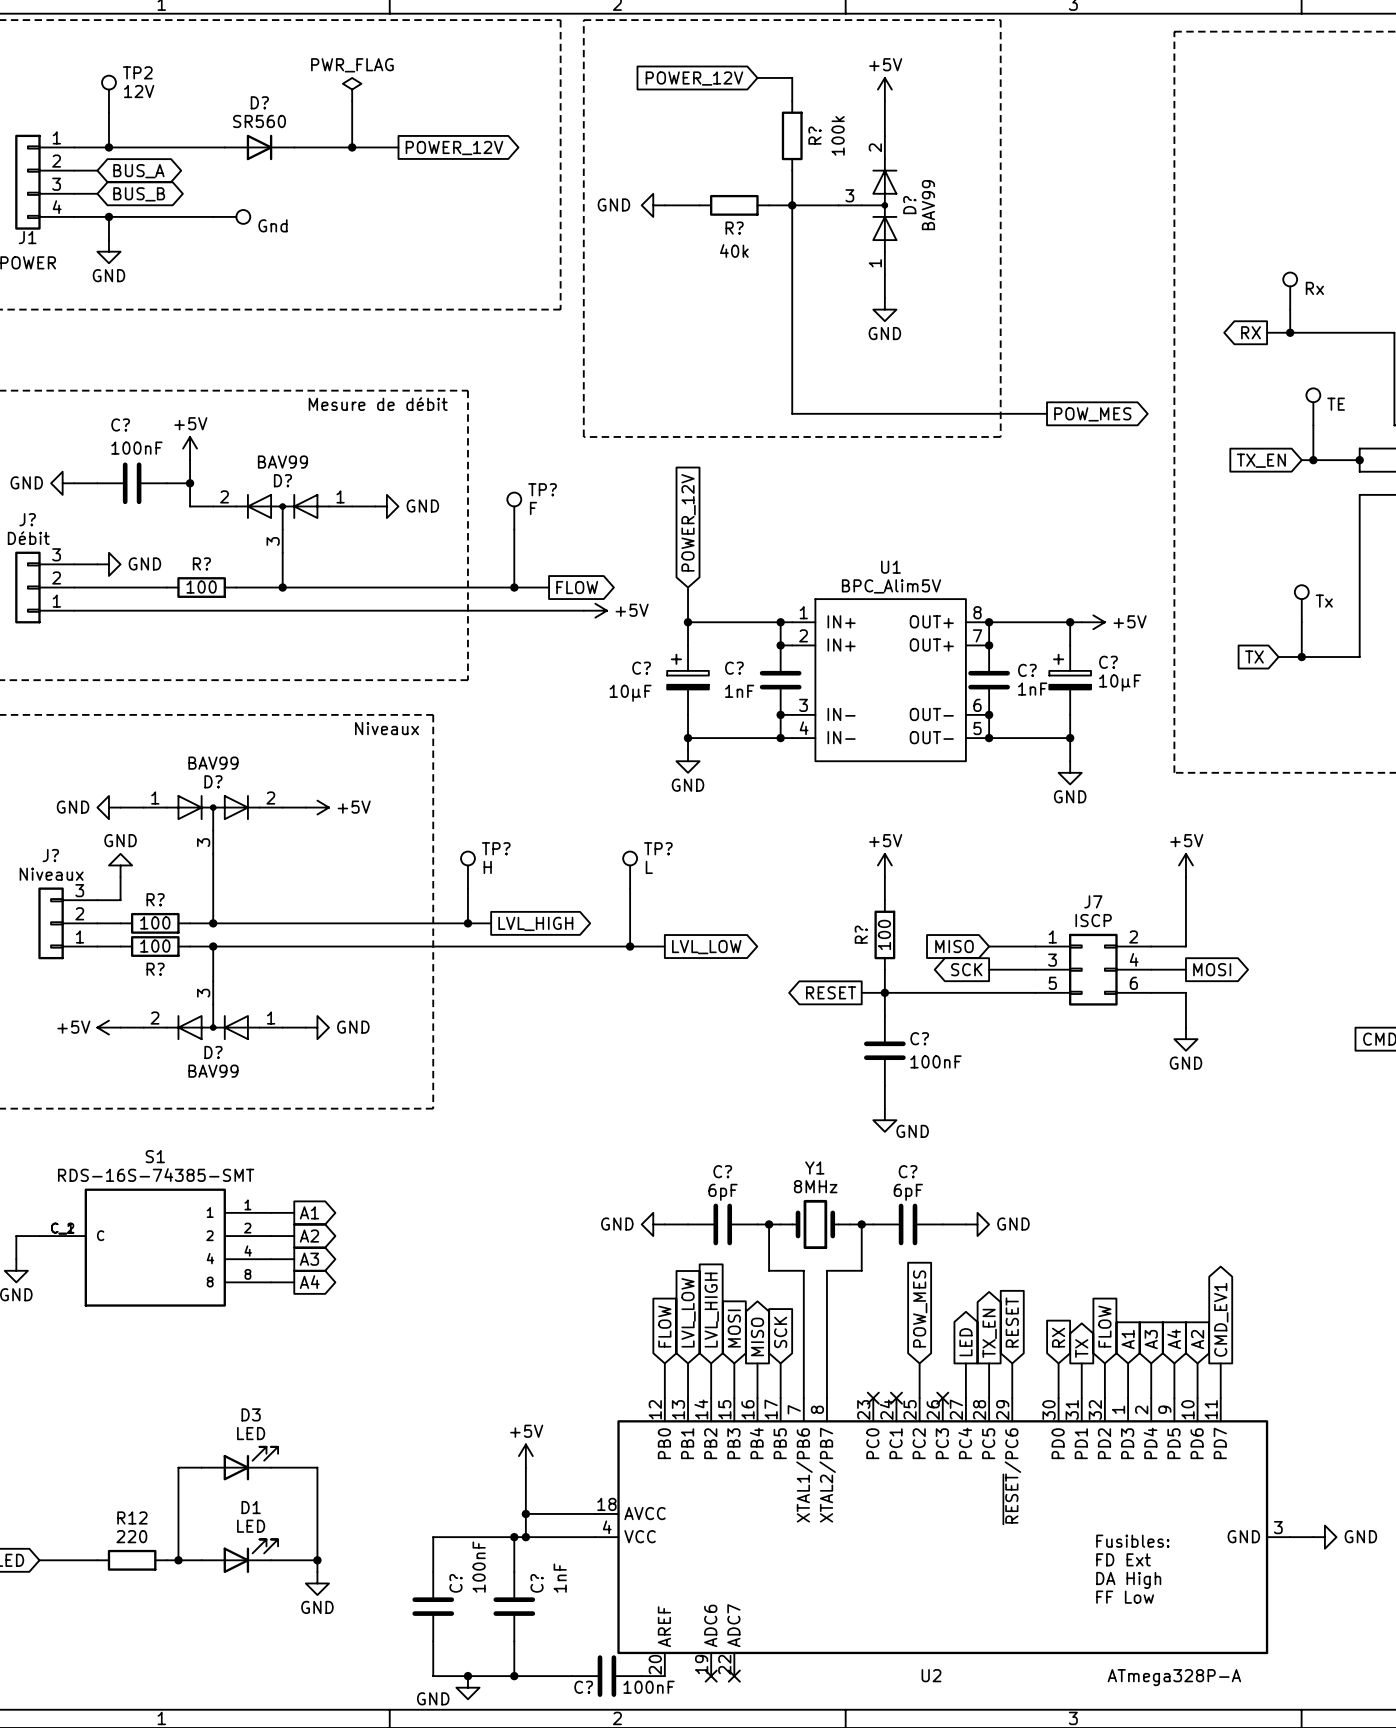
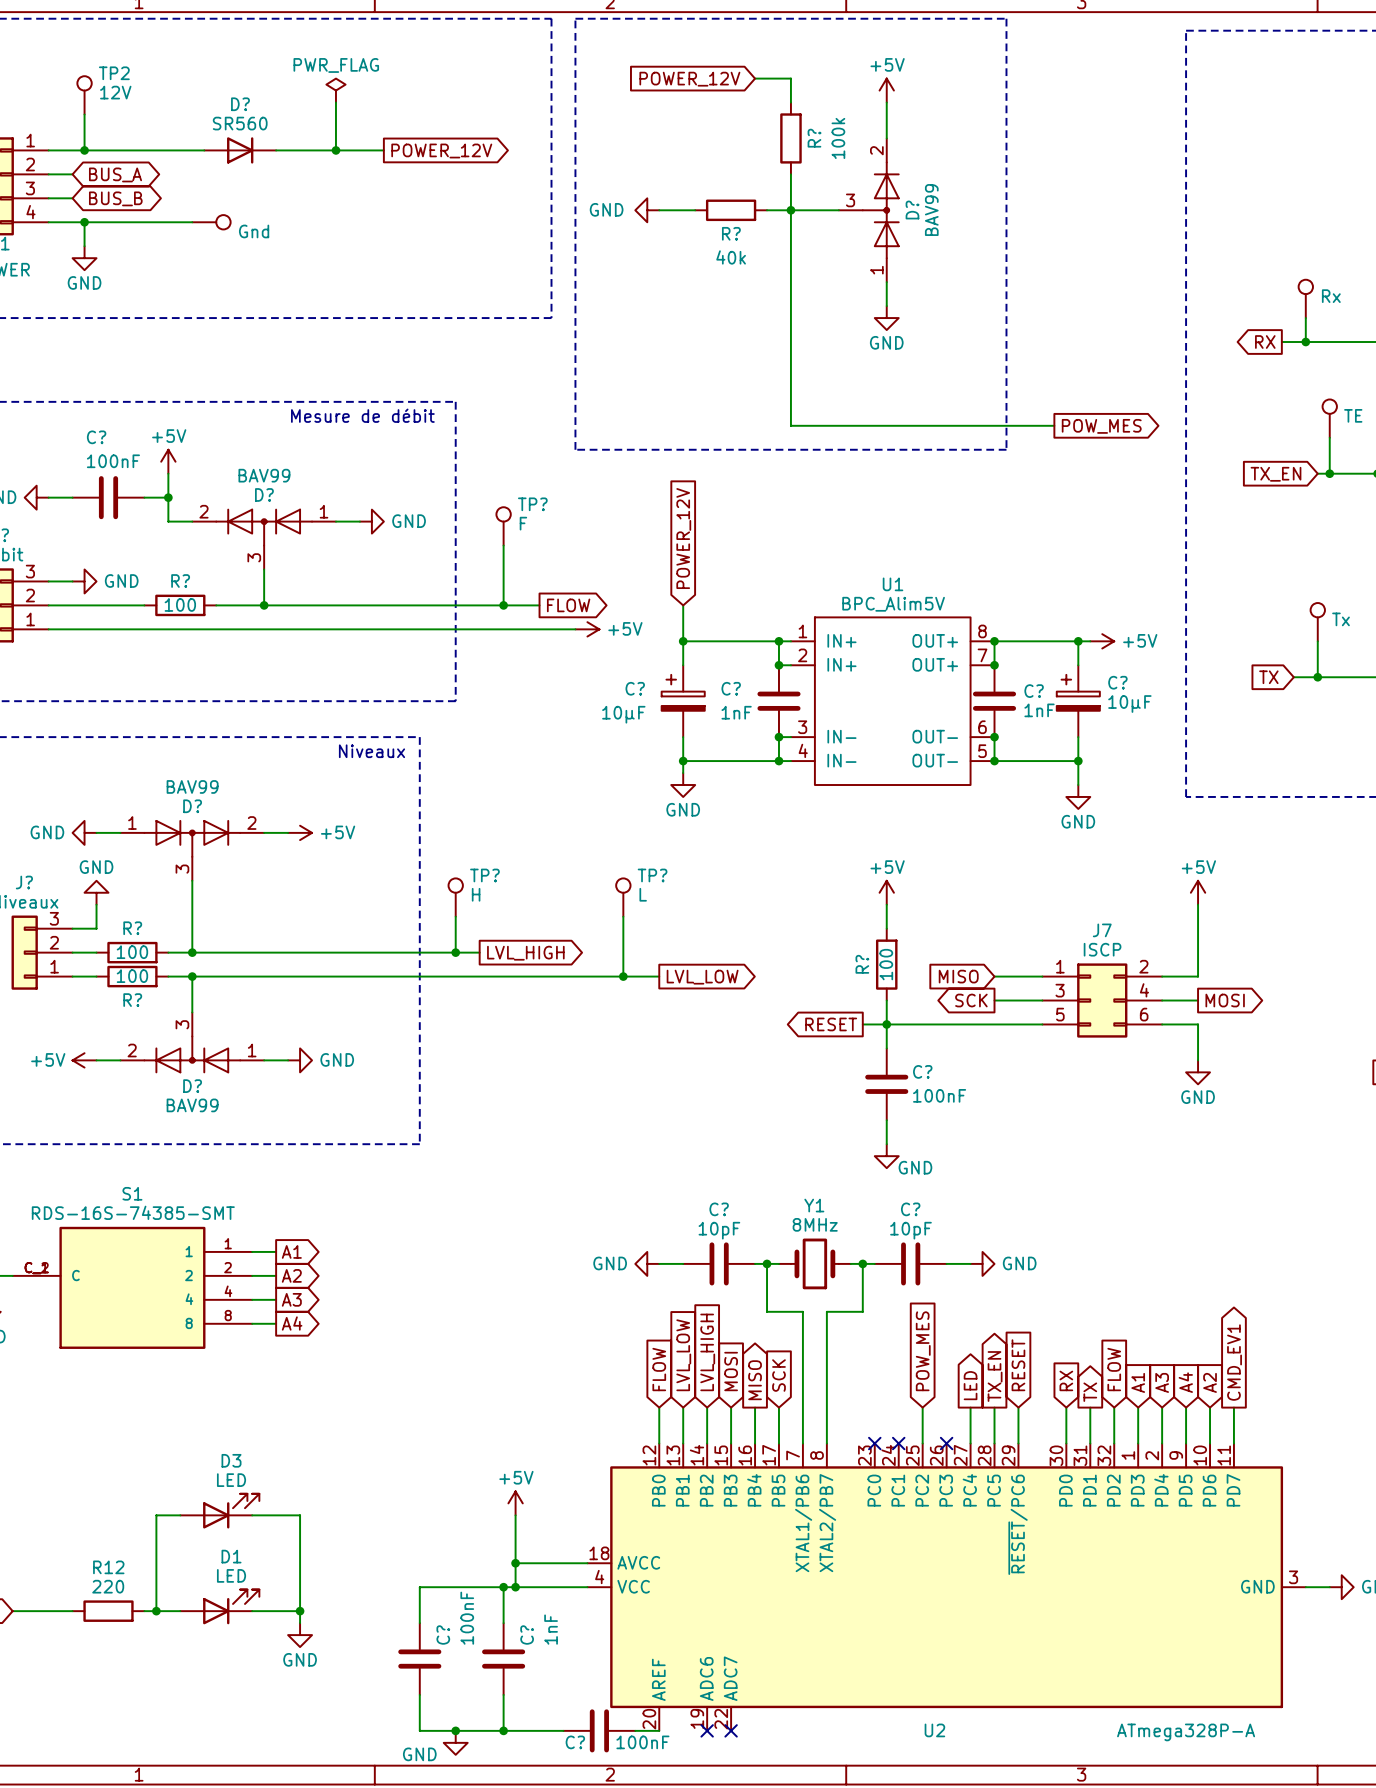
C? value: 6pF (723, 1192) -> 10pF (719, 1230)
C? value: 6pF (908, 1192) -> 10pF (910, 1230)
text: Fusibles: (1132, 1541) -> none
text: FD Ext (1123, 1559) -> none
text: DA High (1128, 1580) -> none
text: FF Low (1125, 1597) -> none

